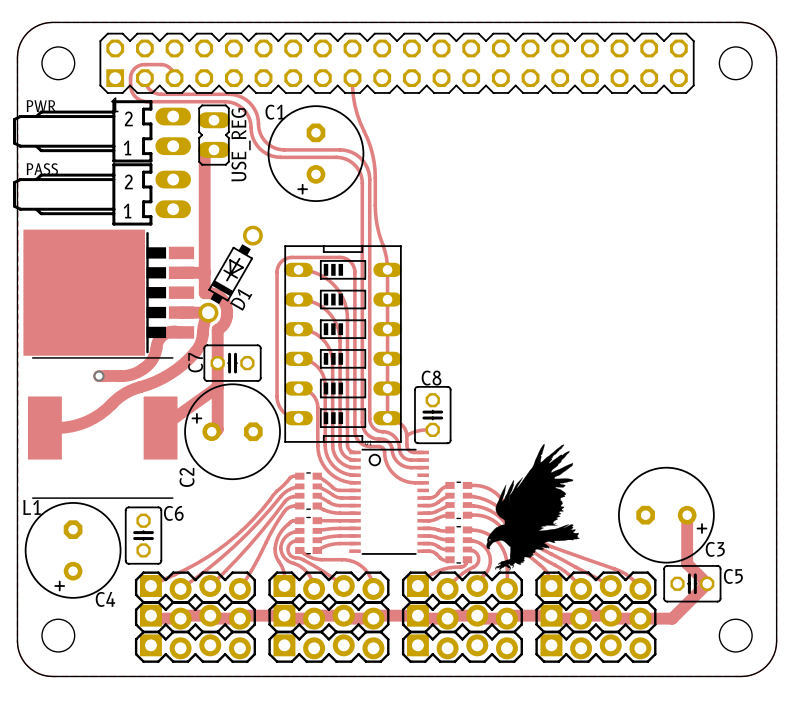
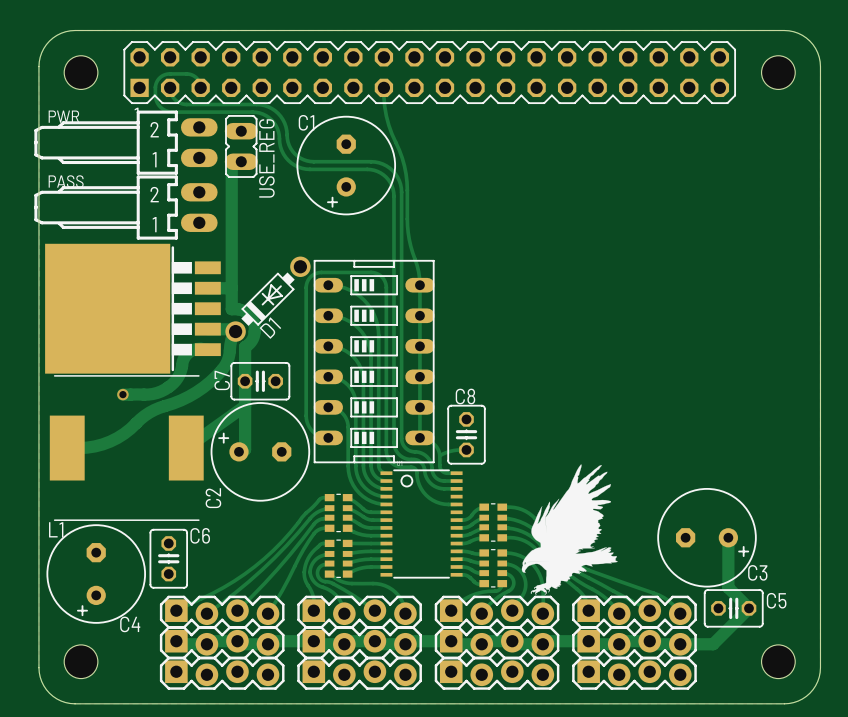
D1 rotation: 0° (230, 274) -> 15° clockwise (268, 299)

